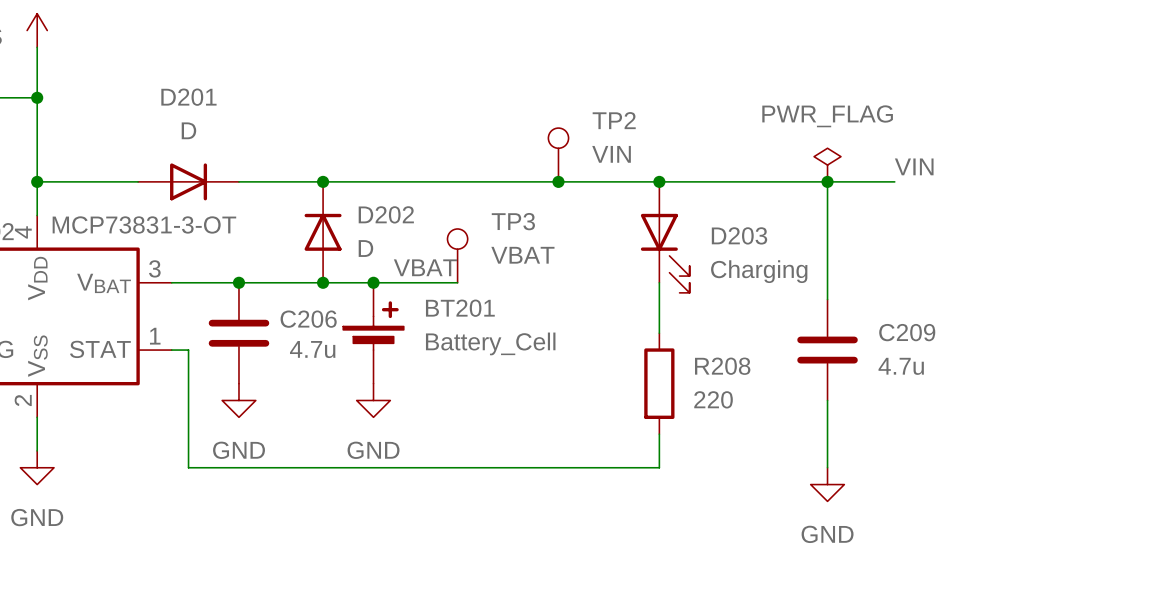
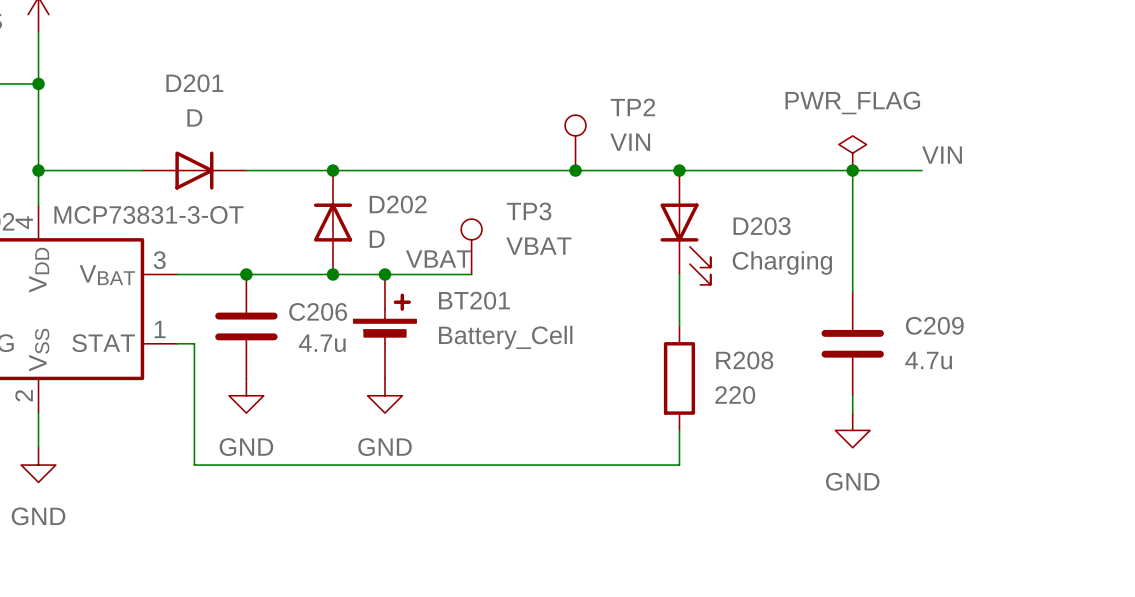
wire: (827, 417) (827, 467) -> none
power symbol position: GND (827, 484) -> GND (852, 430)

